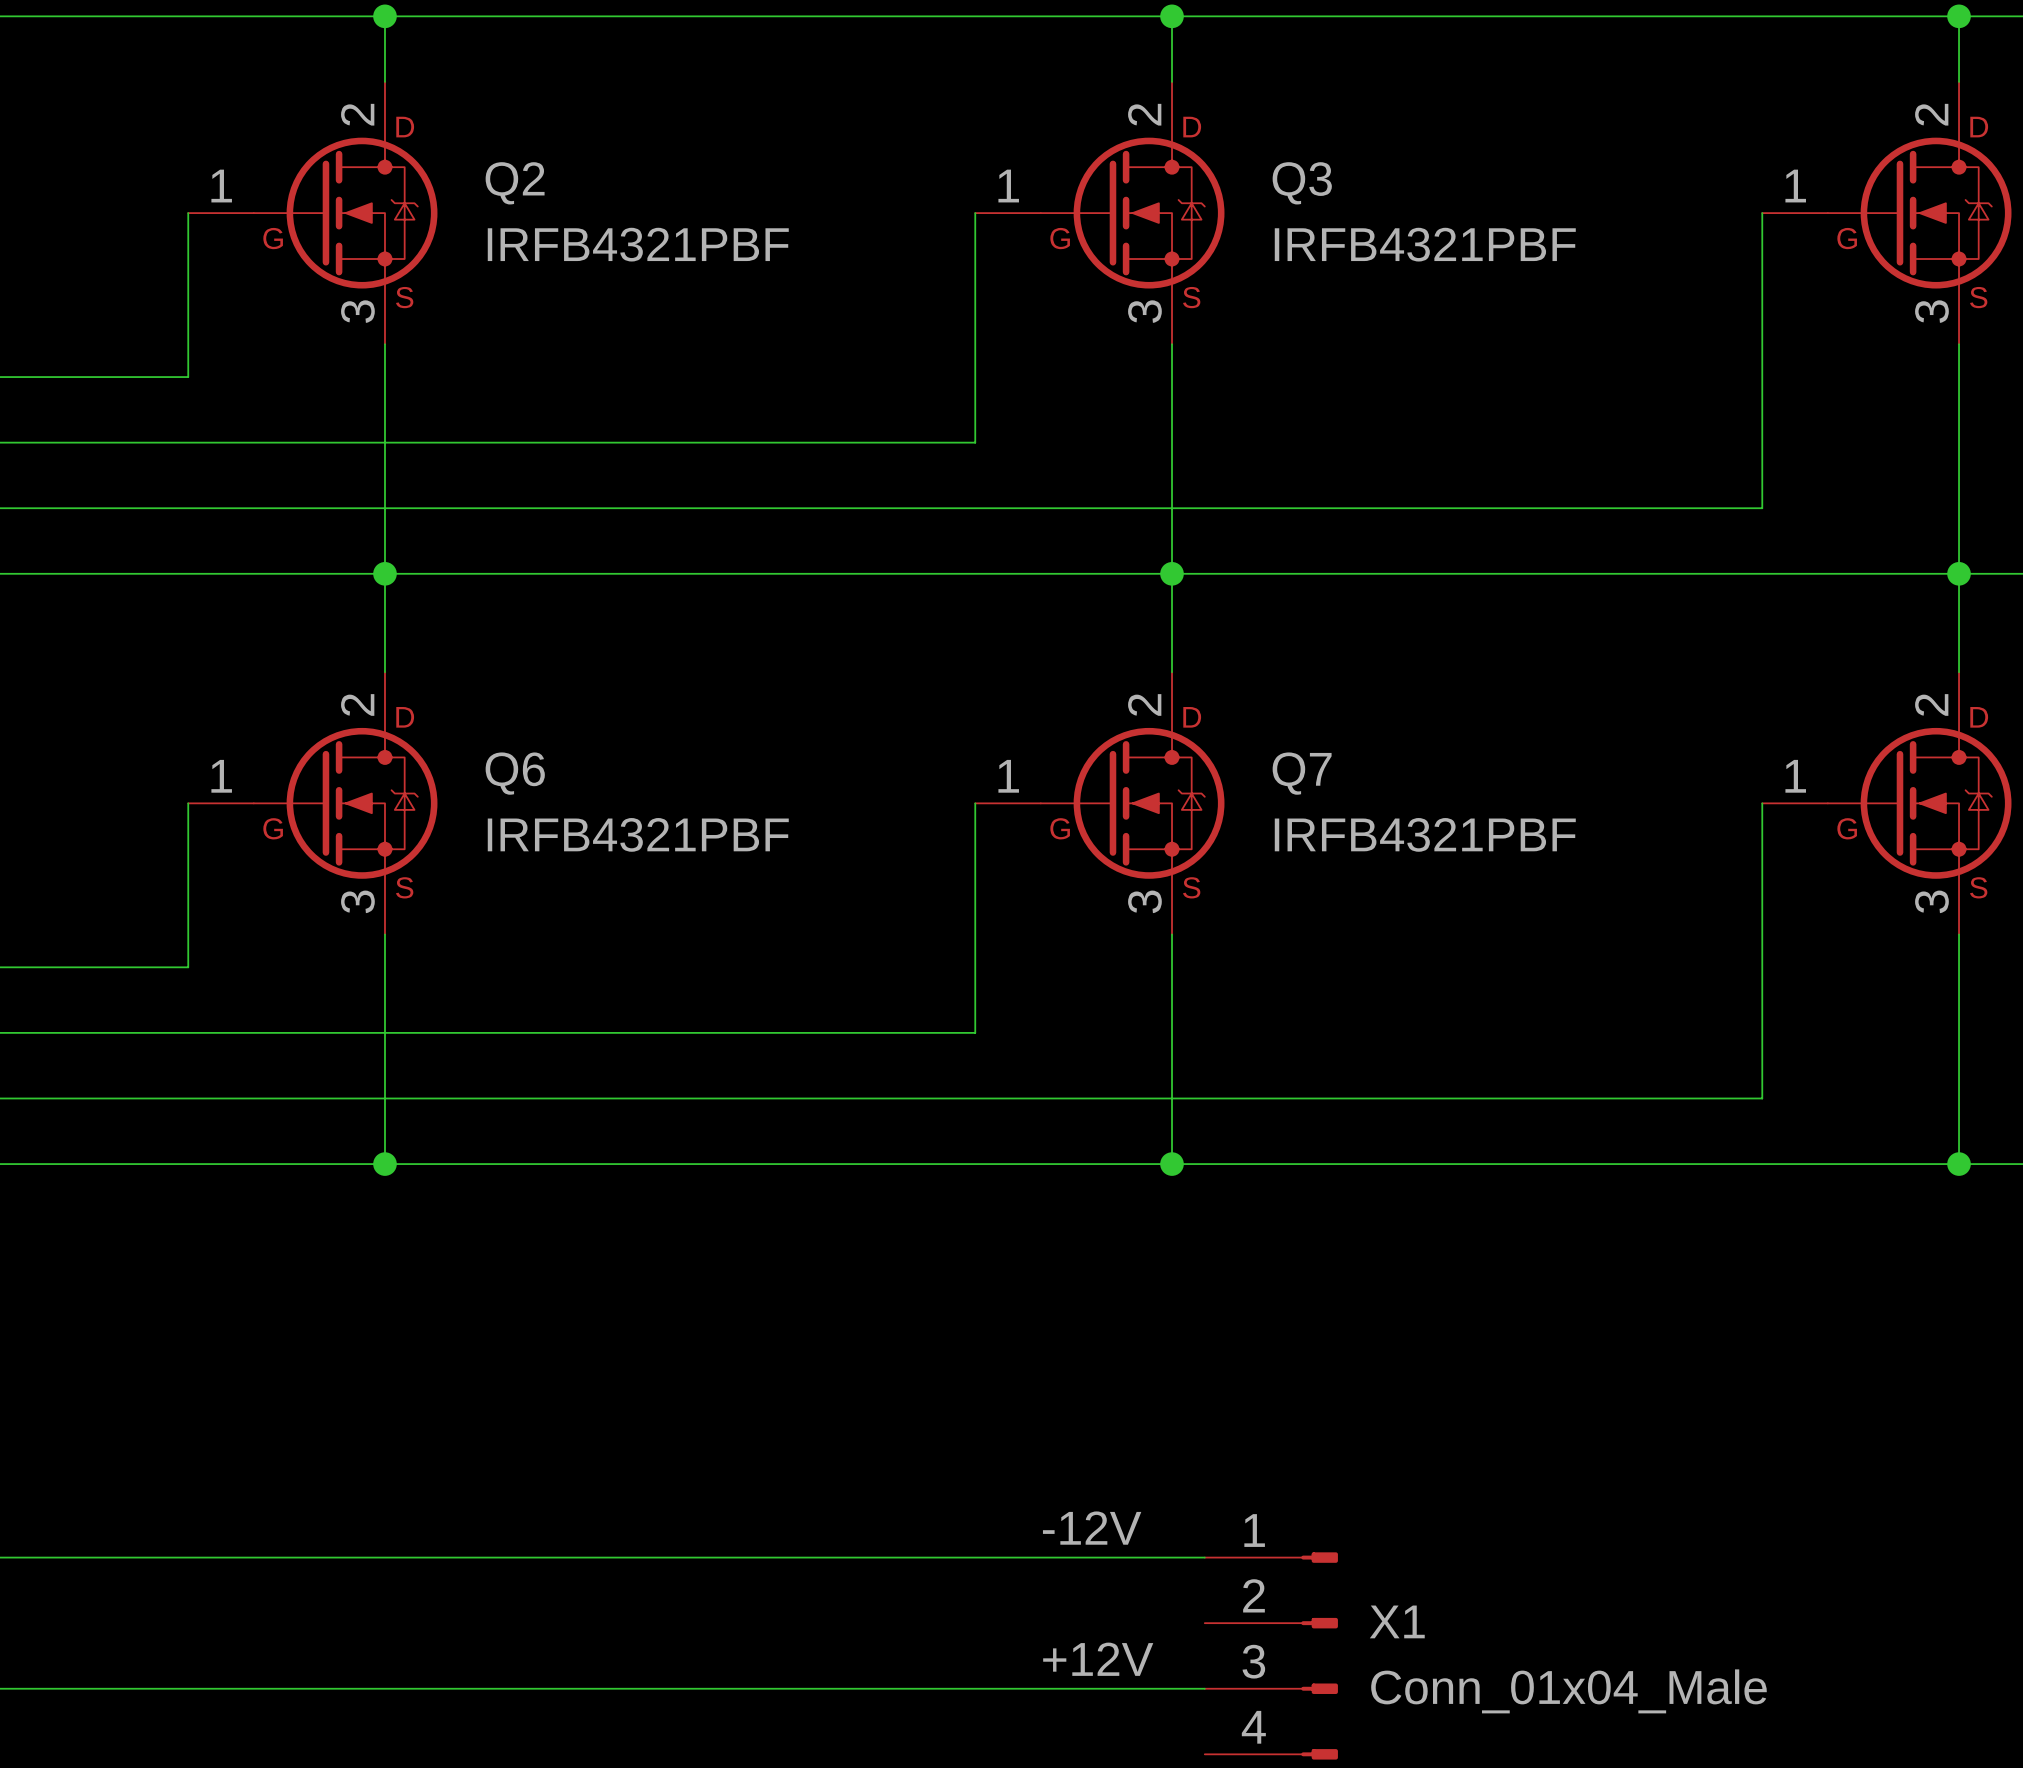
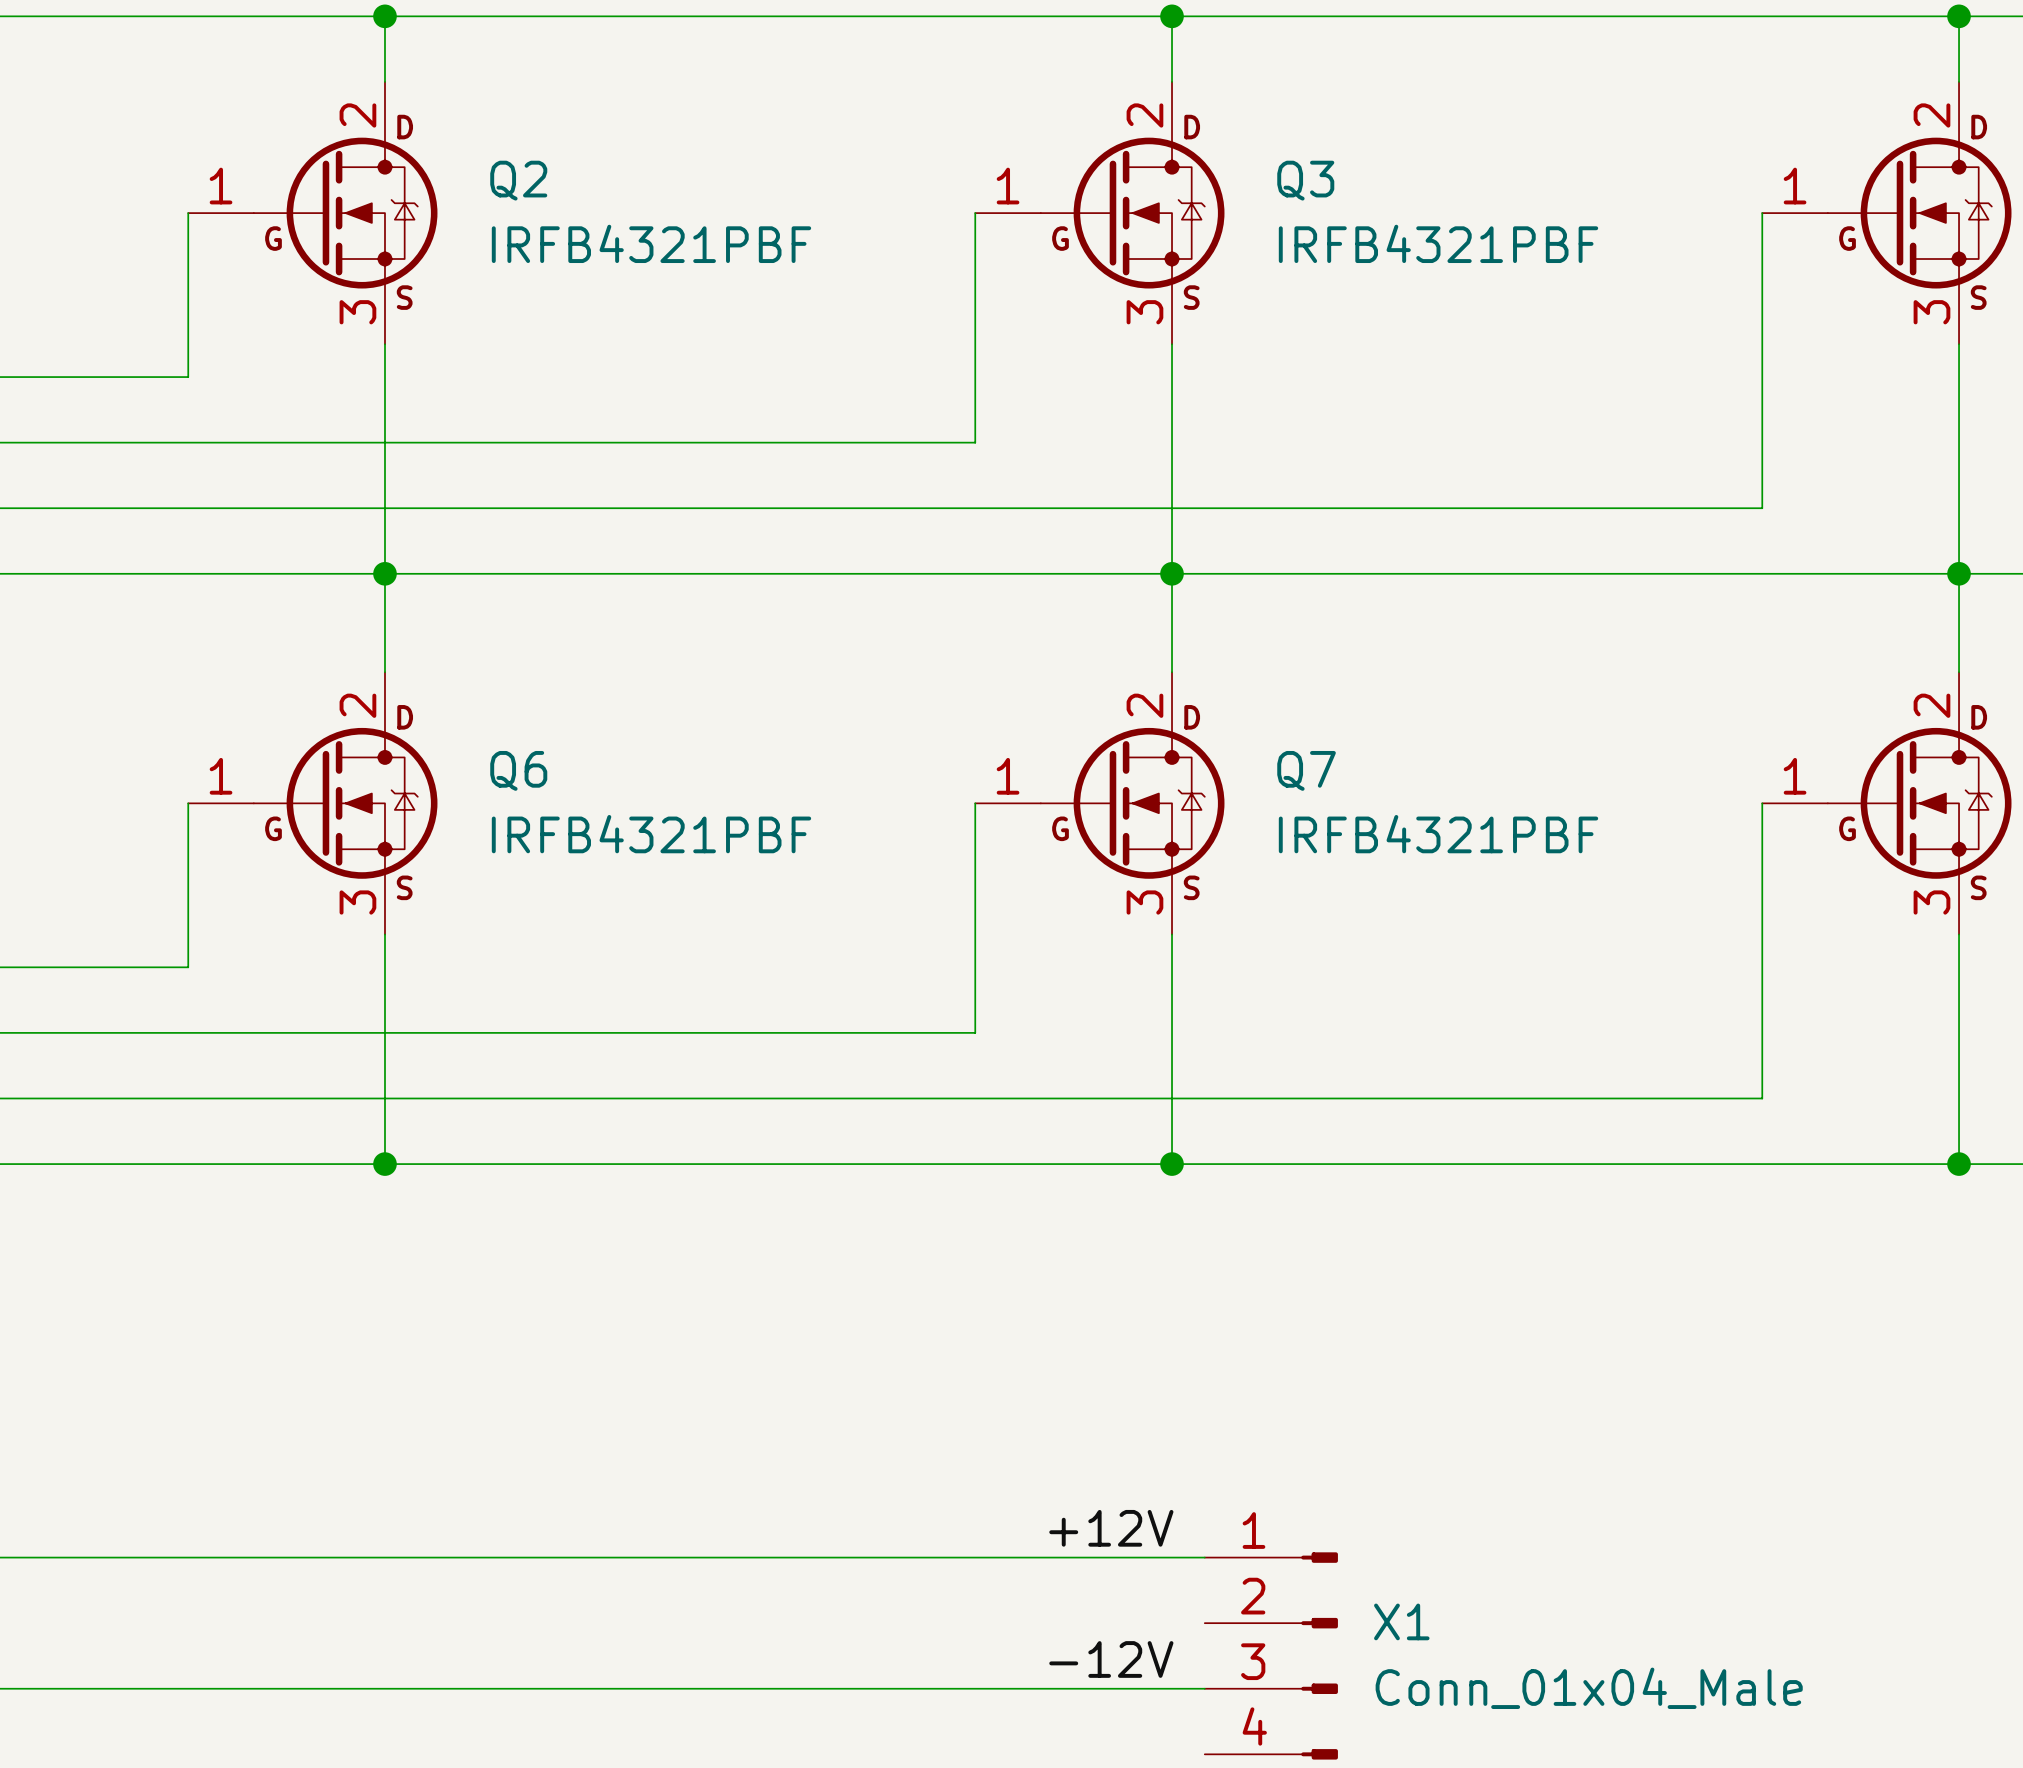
label: -12V (1092, 1528) -> +12V (1111, 1528)
label: +12V (1098, 1659) -> -12V (1111, 1659)

